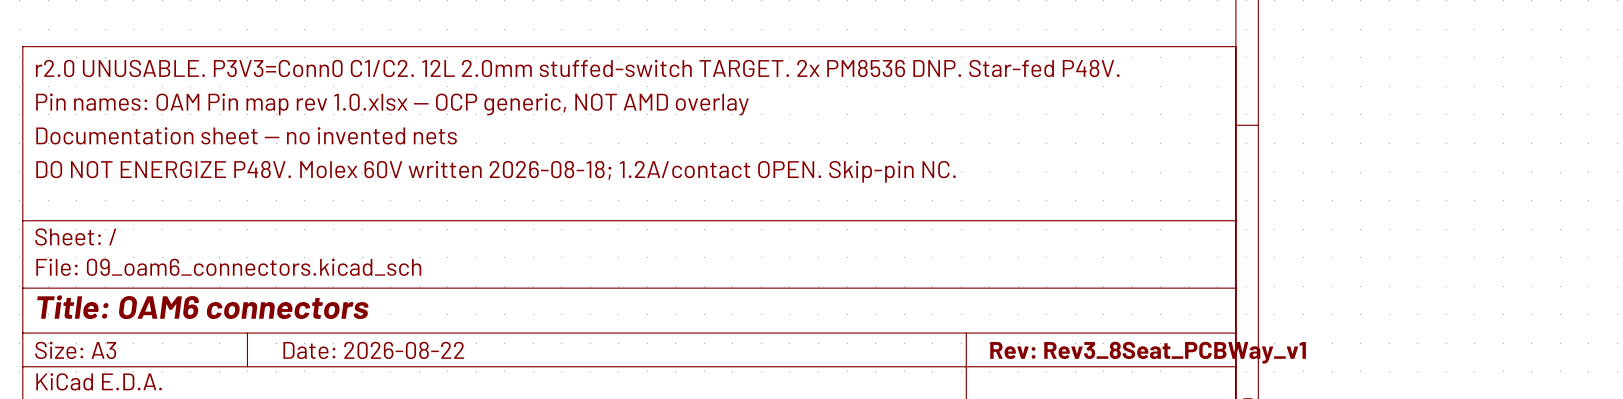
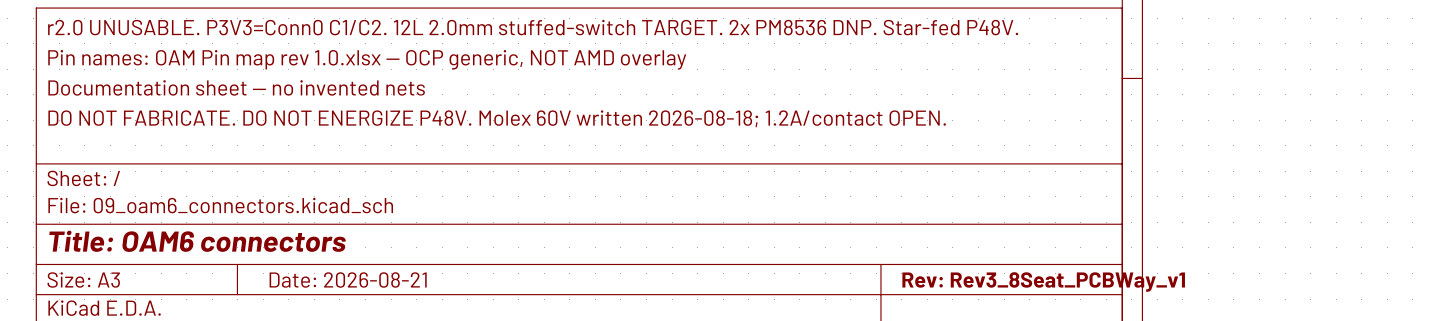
title block: DO NOT ENERGIZE P48V. Molex 60V written 2026-08-18; 1.2A/contact OPEN. Skip-pin NC. (496, 171) -> DO NOT FABRICATE. DO NOT ENERGIZE P48V. Molex 60V written 2026-08-18; 1.2A/contact OPEN. (497, 118)
title block: Date: 2026-08-22 (373, 350) -> Date: 2026-08-21 (348, 279)

